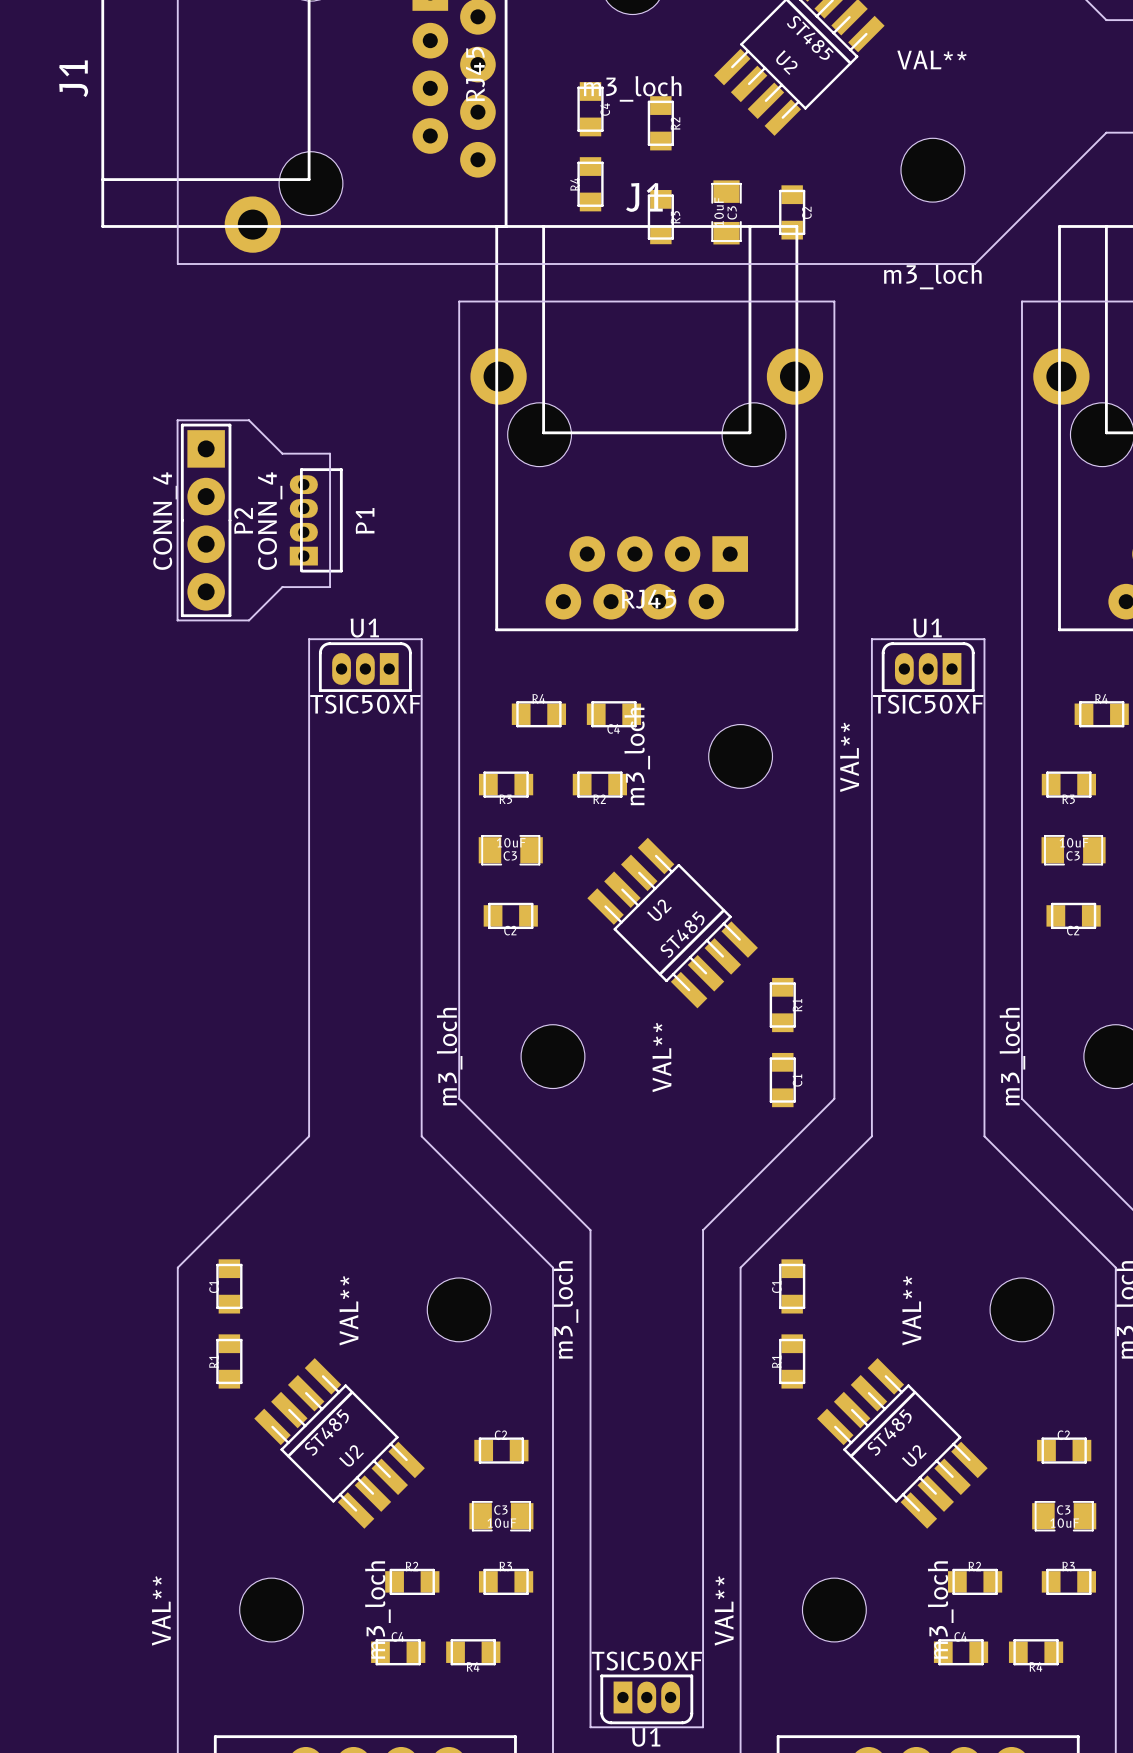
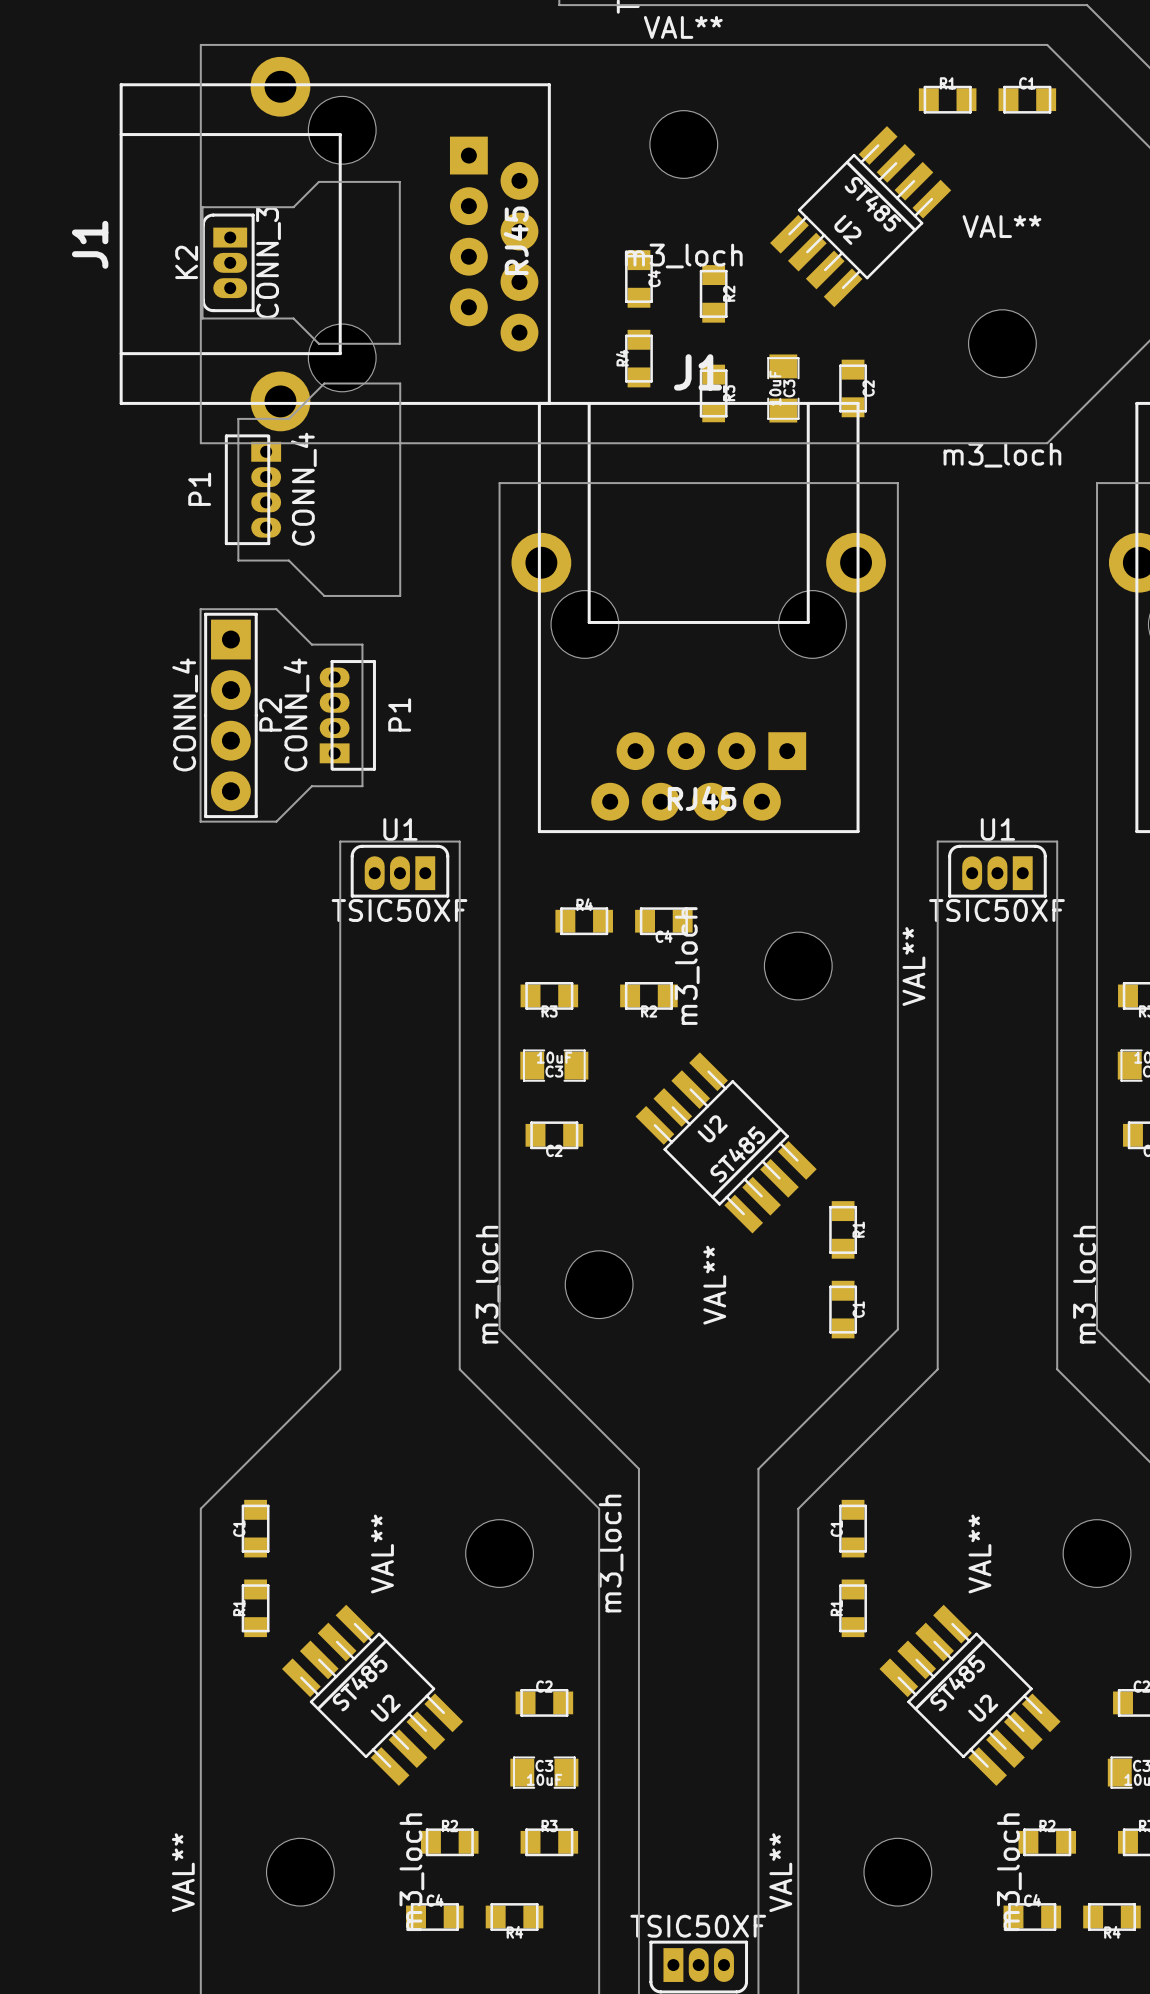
board edge: none -> (318, 181) (399, 181) (399, 343) (318, 343) (293, 318) (202, 318) (202, 207) (293, 207) (318, 181)
K2: none -> CONN_3 (228, 262)
board edge: none -> (324, 383) (288, 418) (238, 418) (238, 560) (288, 560) (324, 595) (400, 595) (400, 383) (324, 383)
P1: none -> CONN_4 (252, 489)

